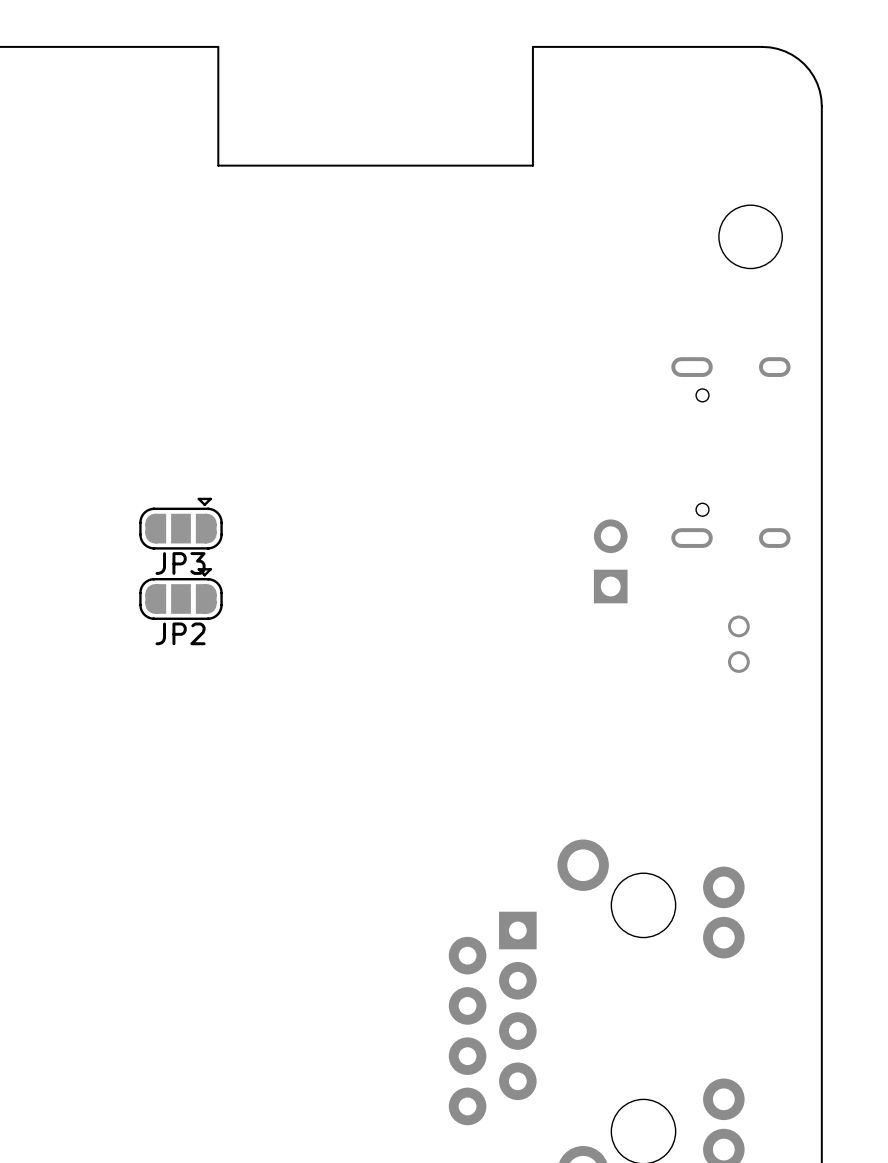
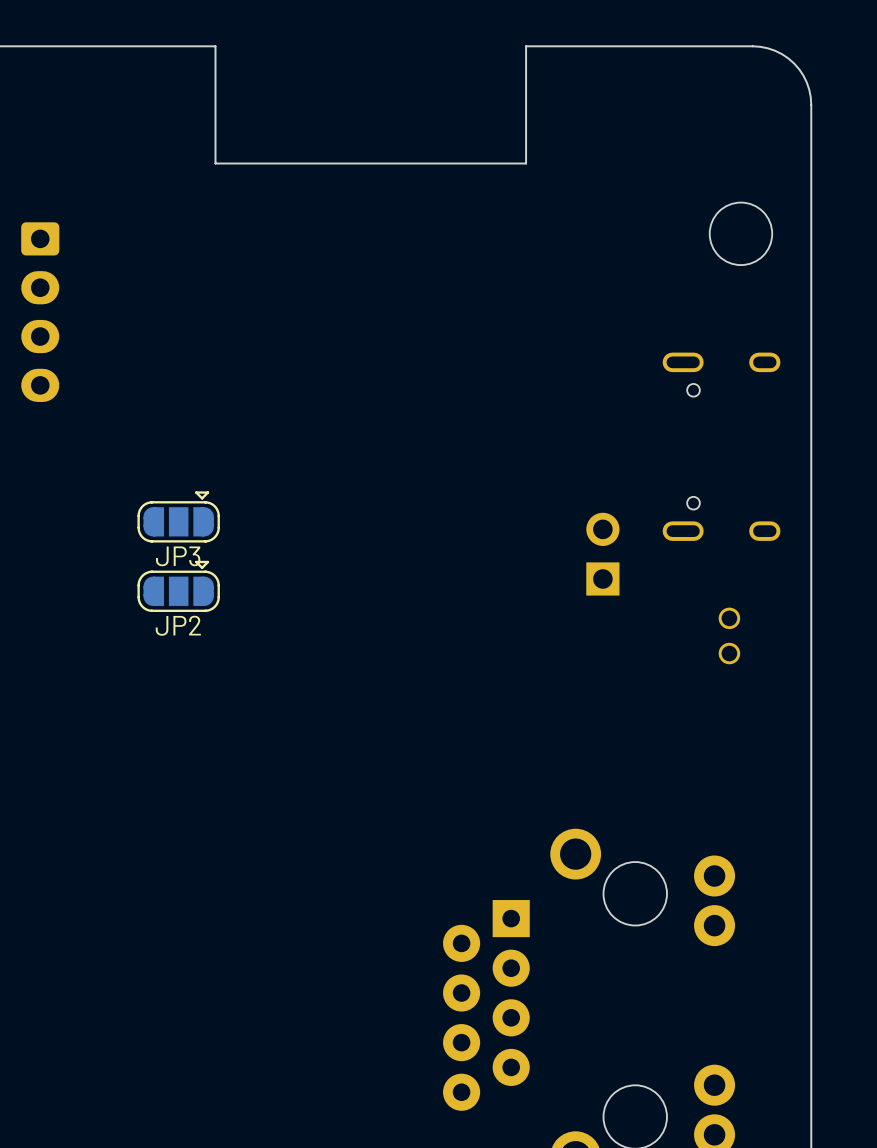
part: none -> (40, 312)

